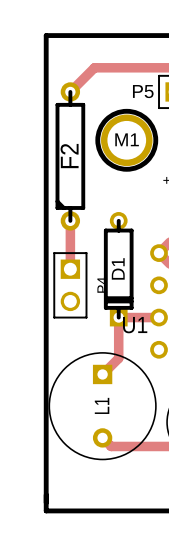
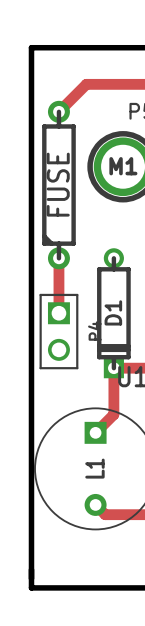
F2 value: none -> FUSE (58, 184)
F2 name: F2 (69, 156) -> none

